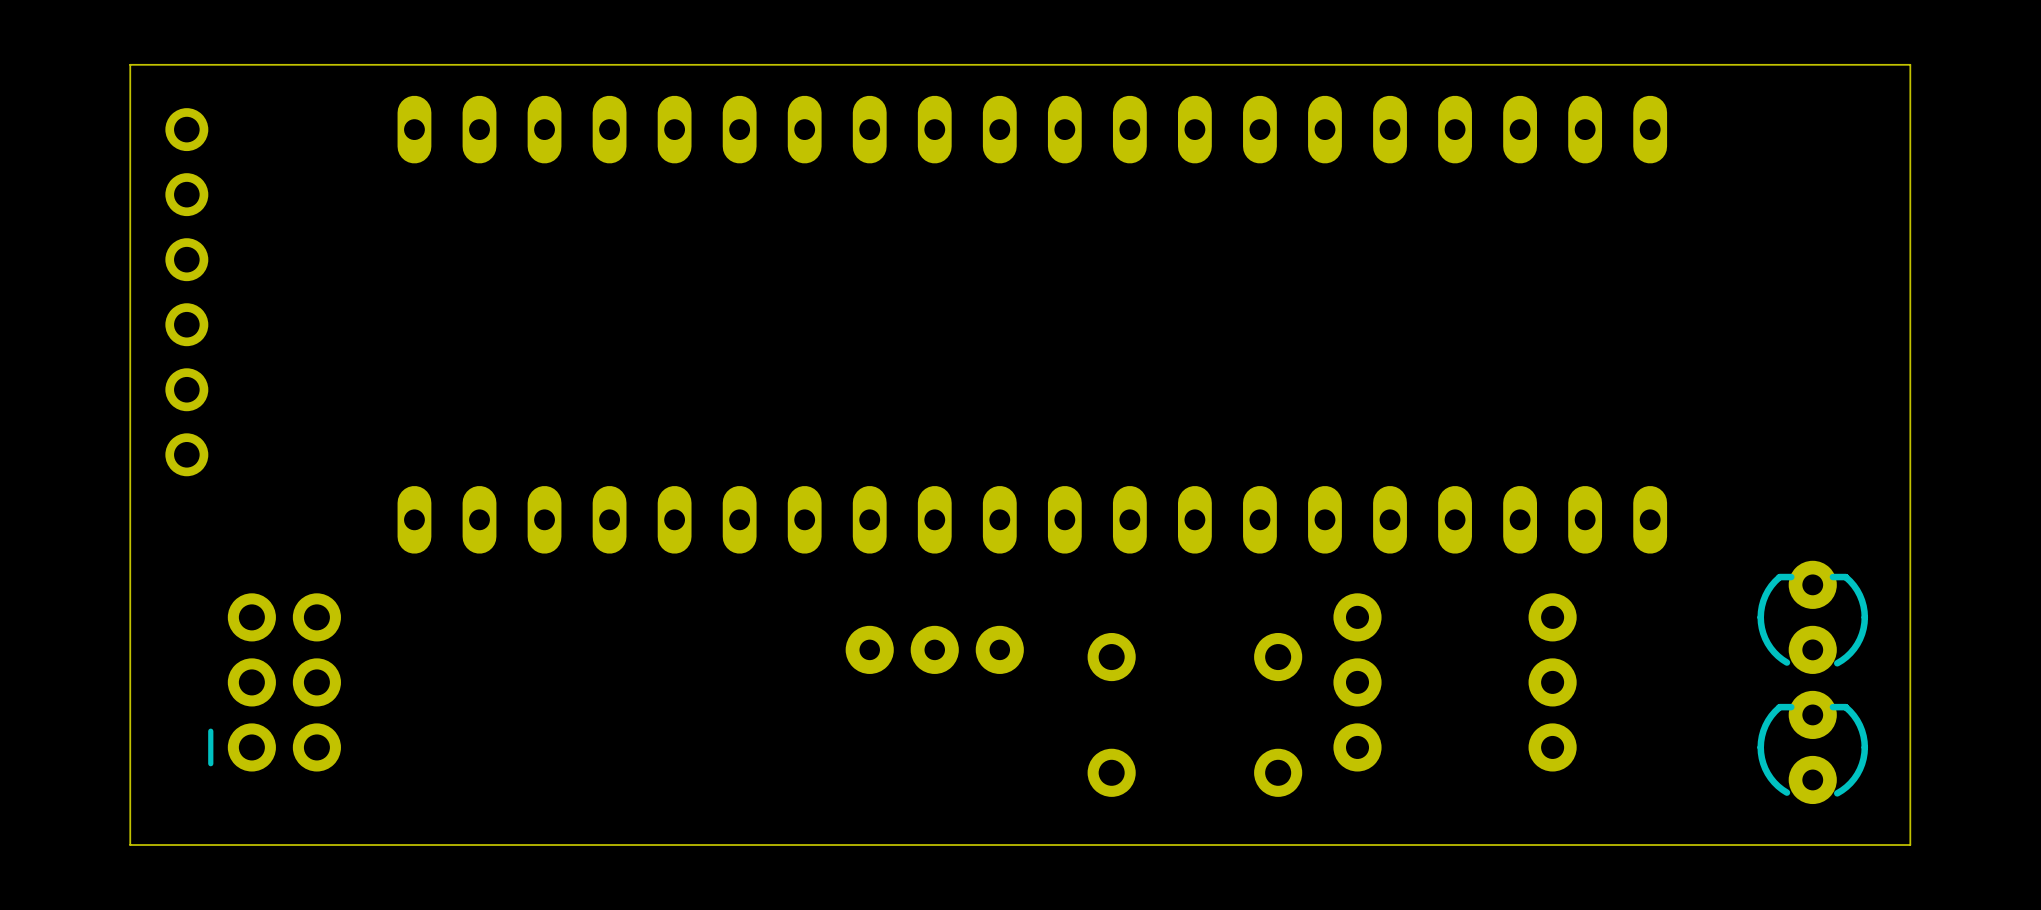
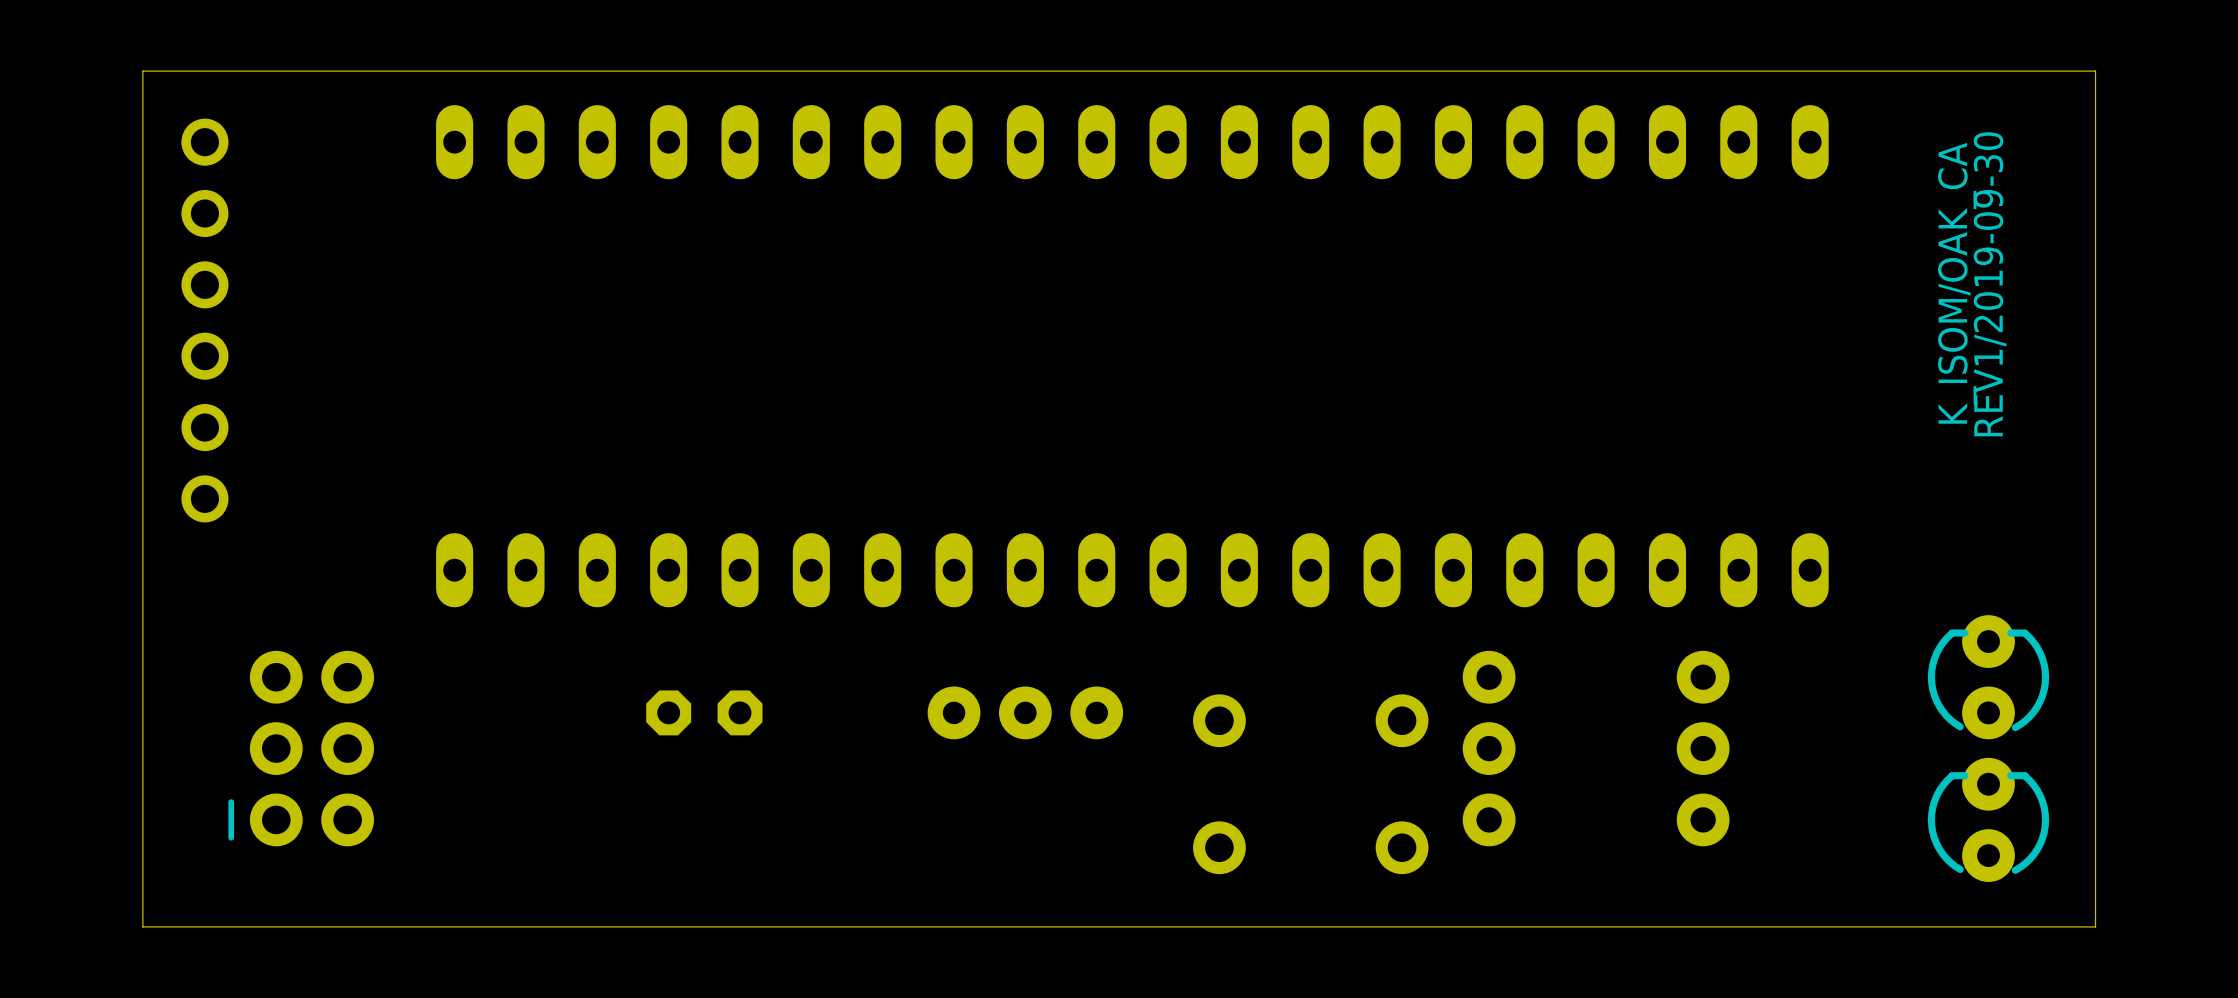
text: none -> K_ISOM/OAK_CA (1957, 283)
text: none -> REV1/2019-09-30 (1990, 284)
part: none -> (704, 712)

